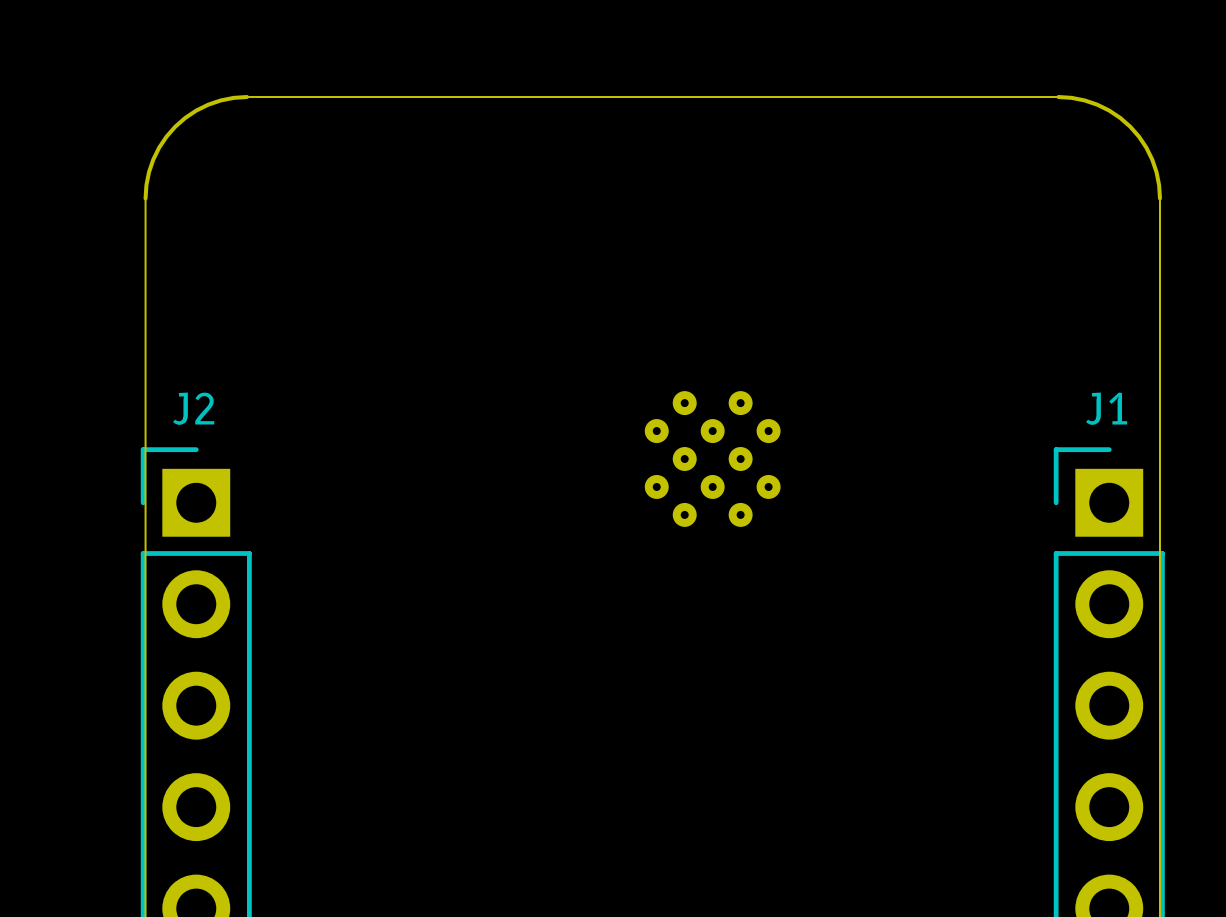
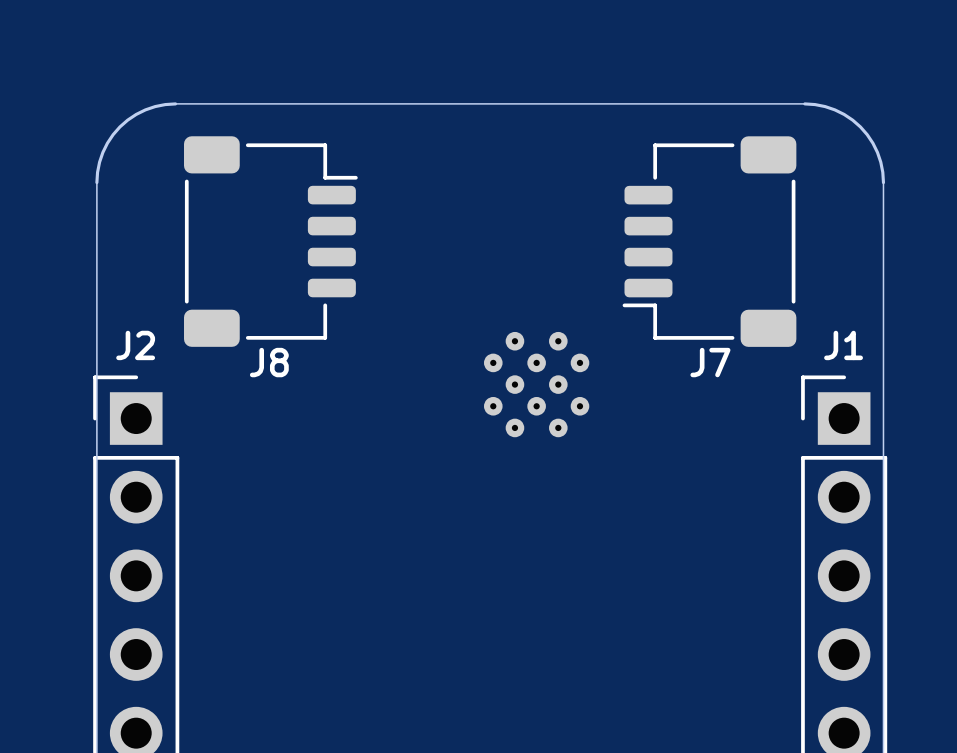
J8: none -> (270, 241)
J7: none -> (709, 241)

